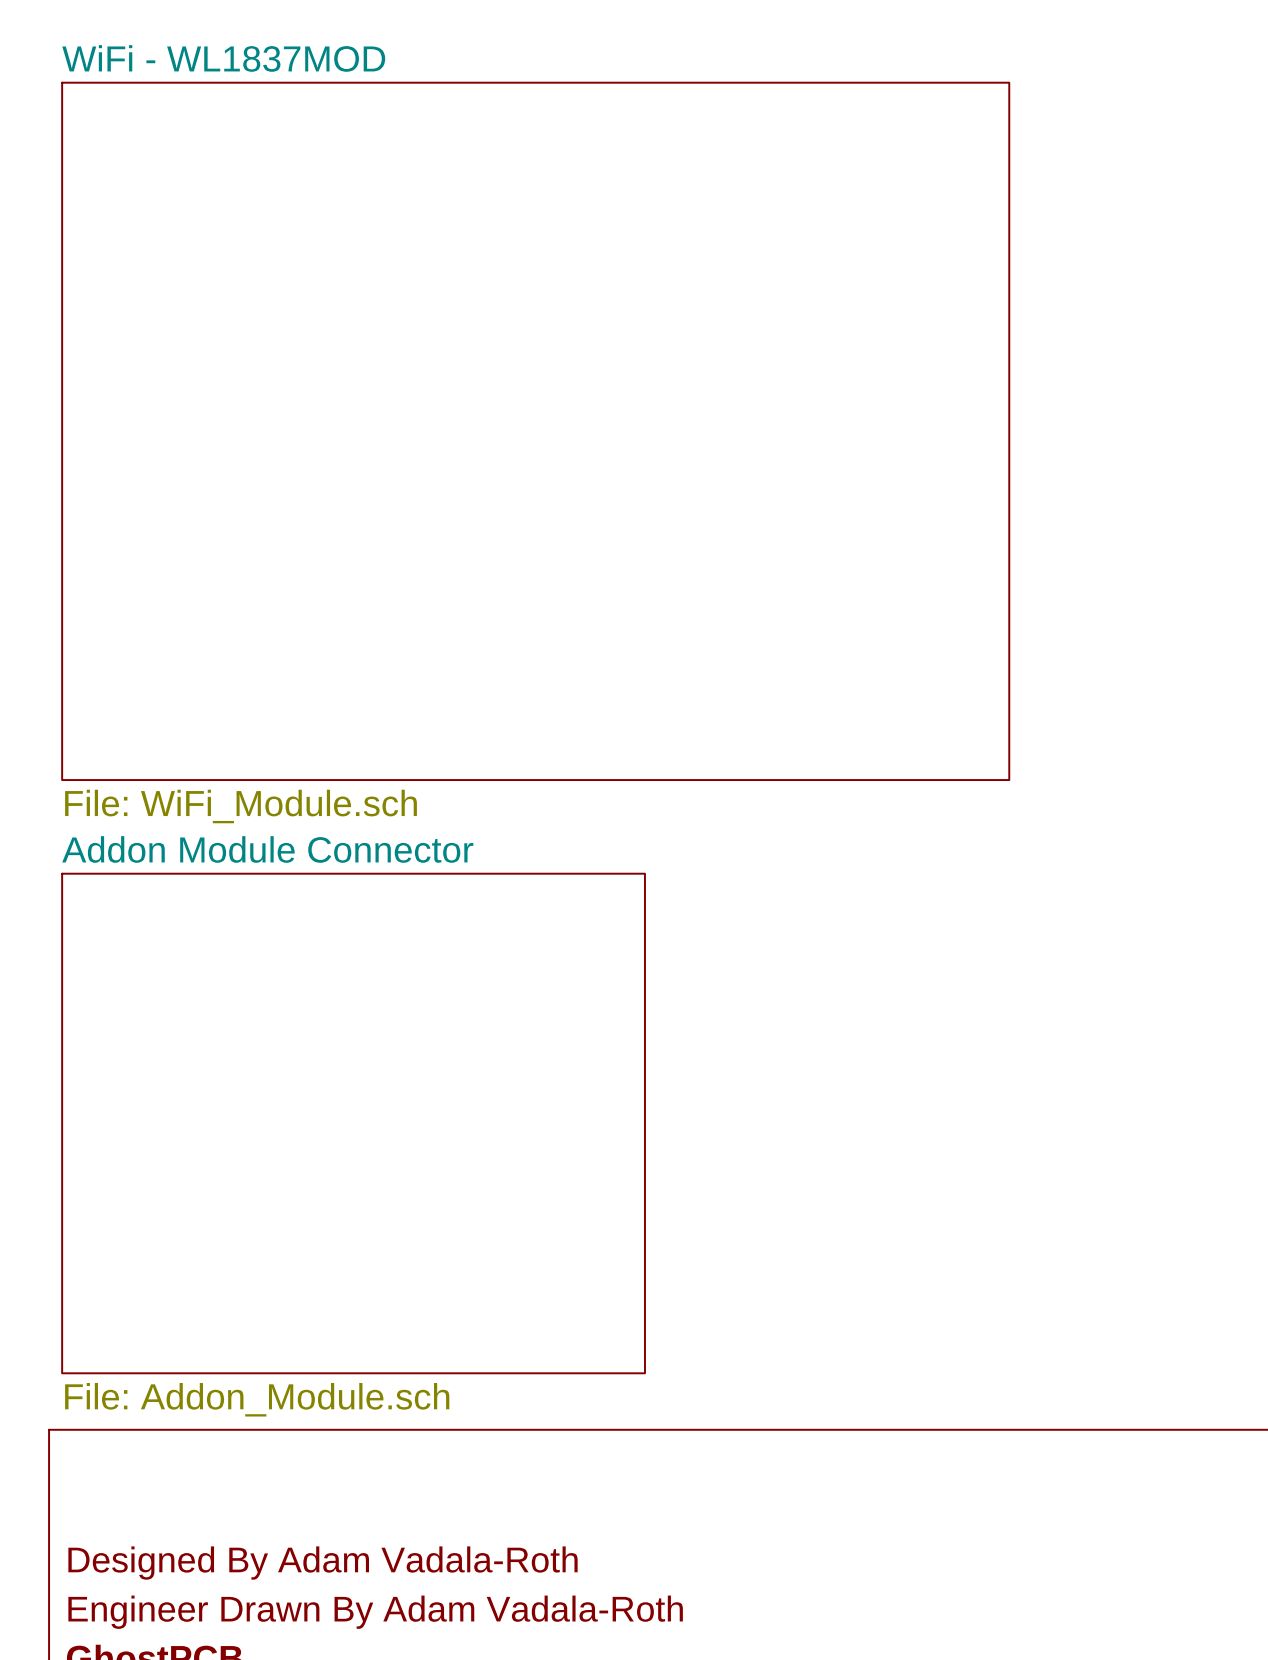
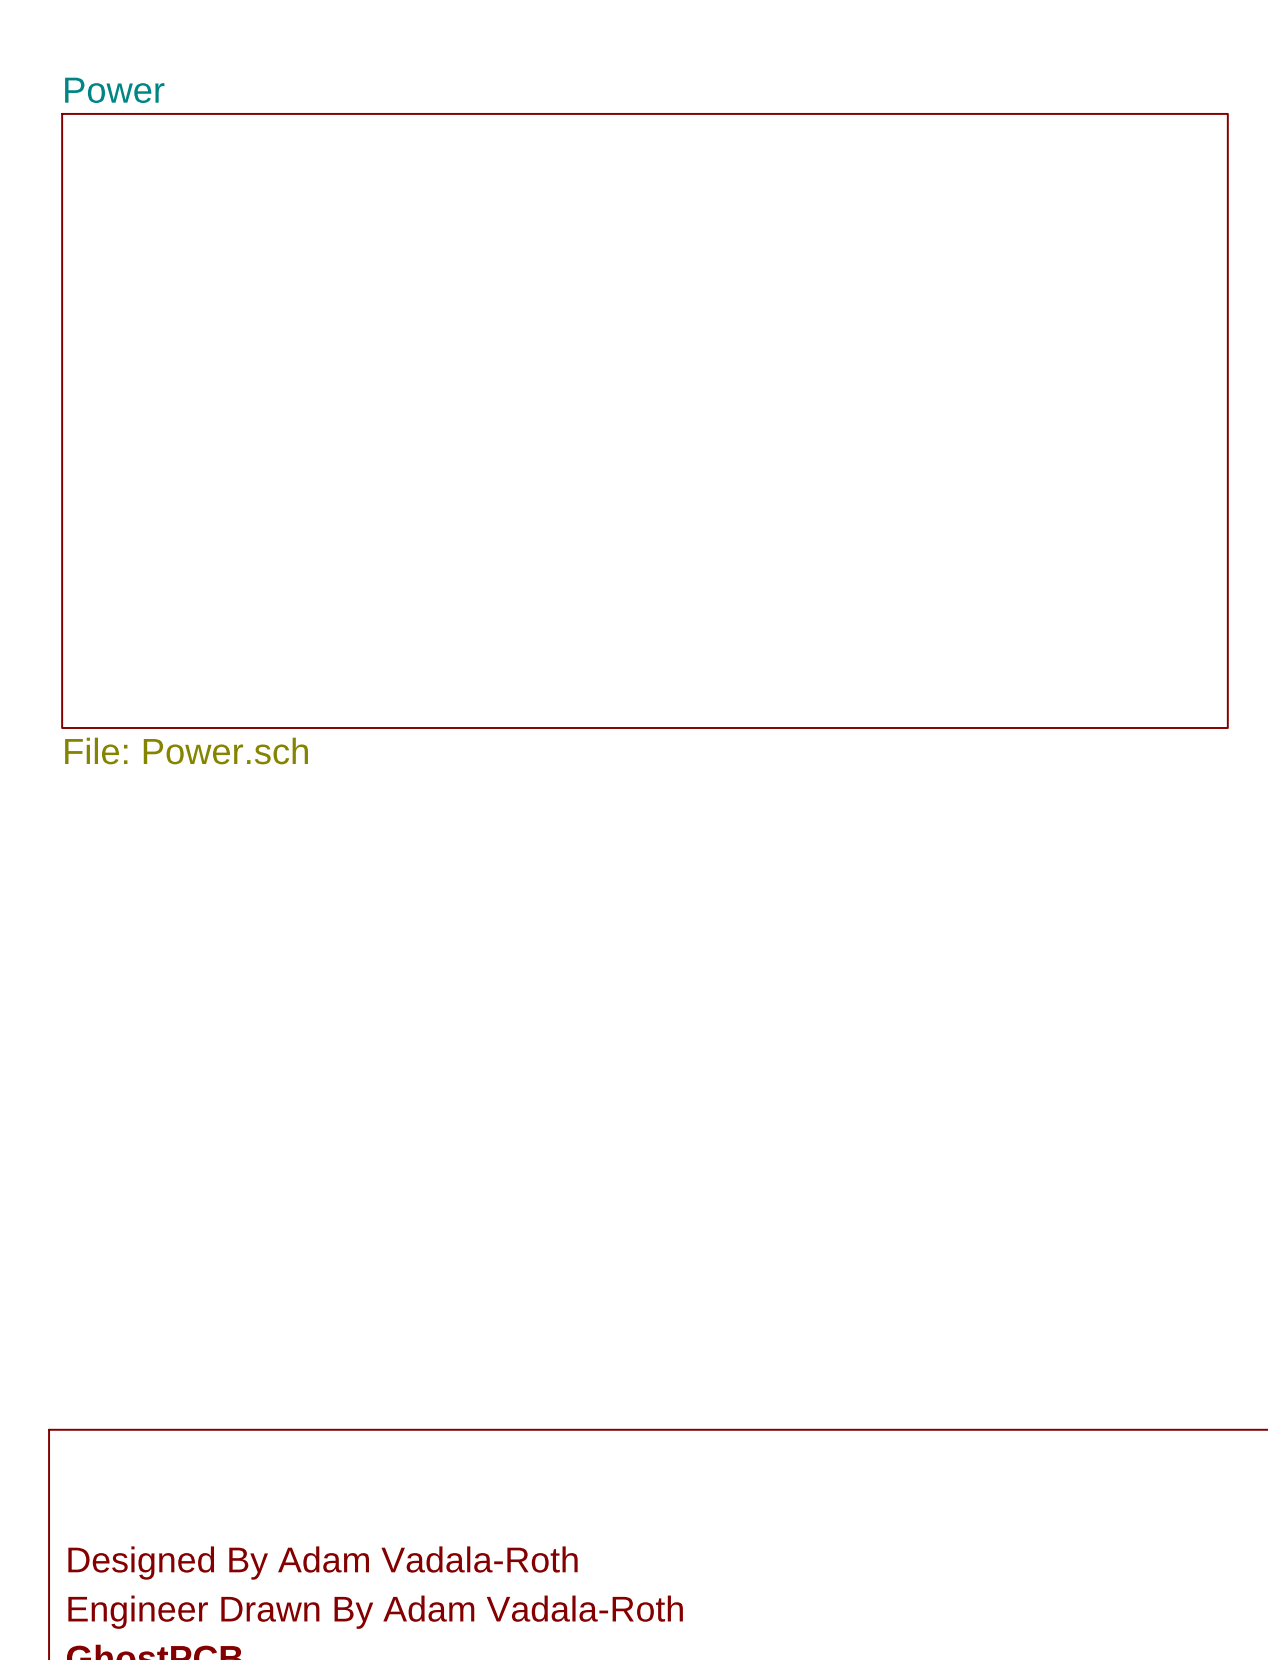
sheet Power: none -> File: Power.sch (644, 420)
sheet WiFi - WL1837MOD: File: WiFi_Module.sch (535, 431) -> none
sheet Addon Module Connector: File: Addon_Module.sch (353, 1123) -> none

